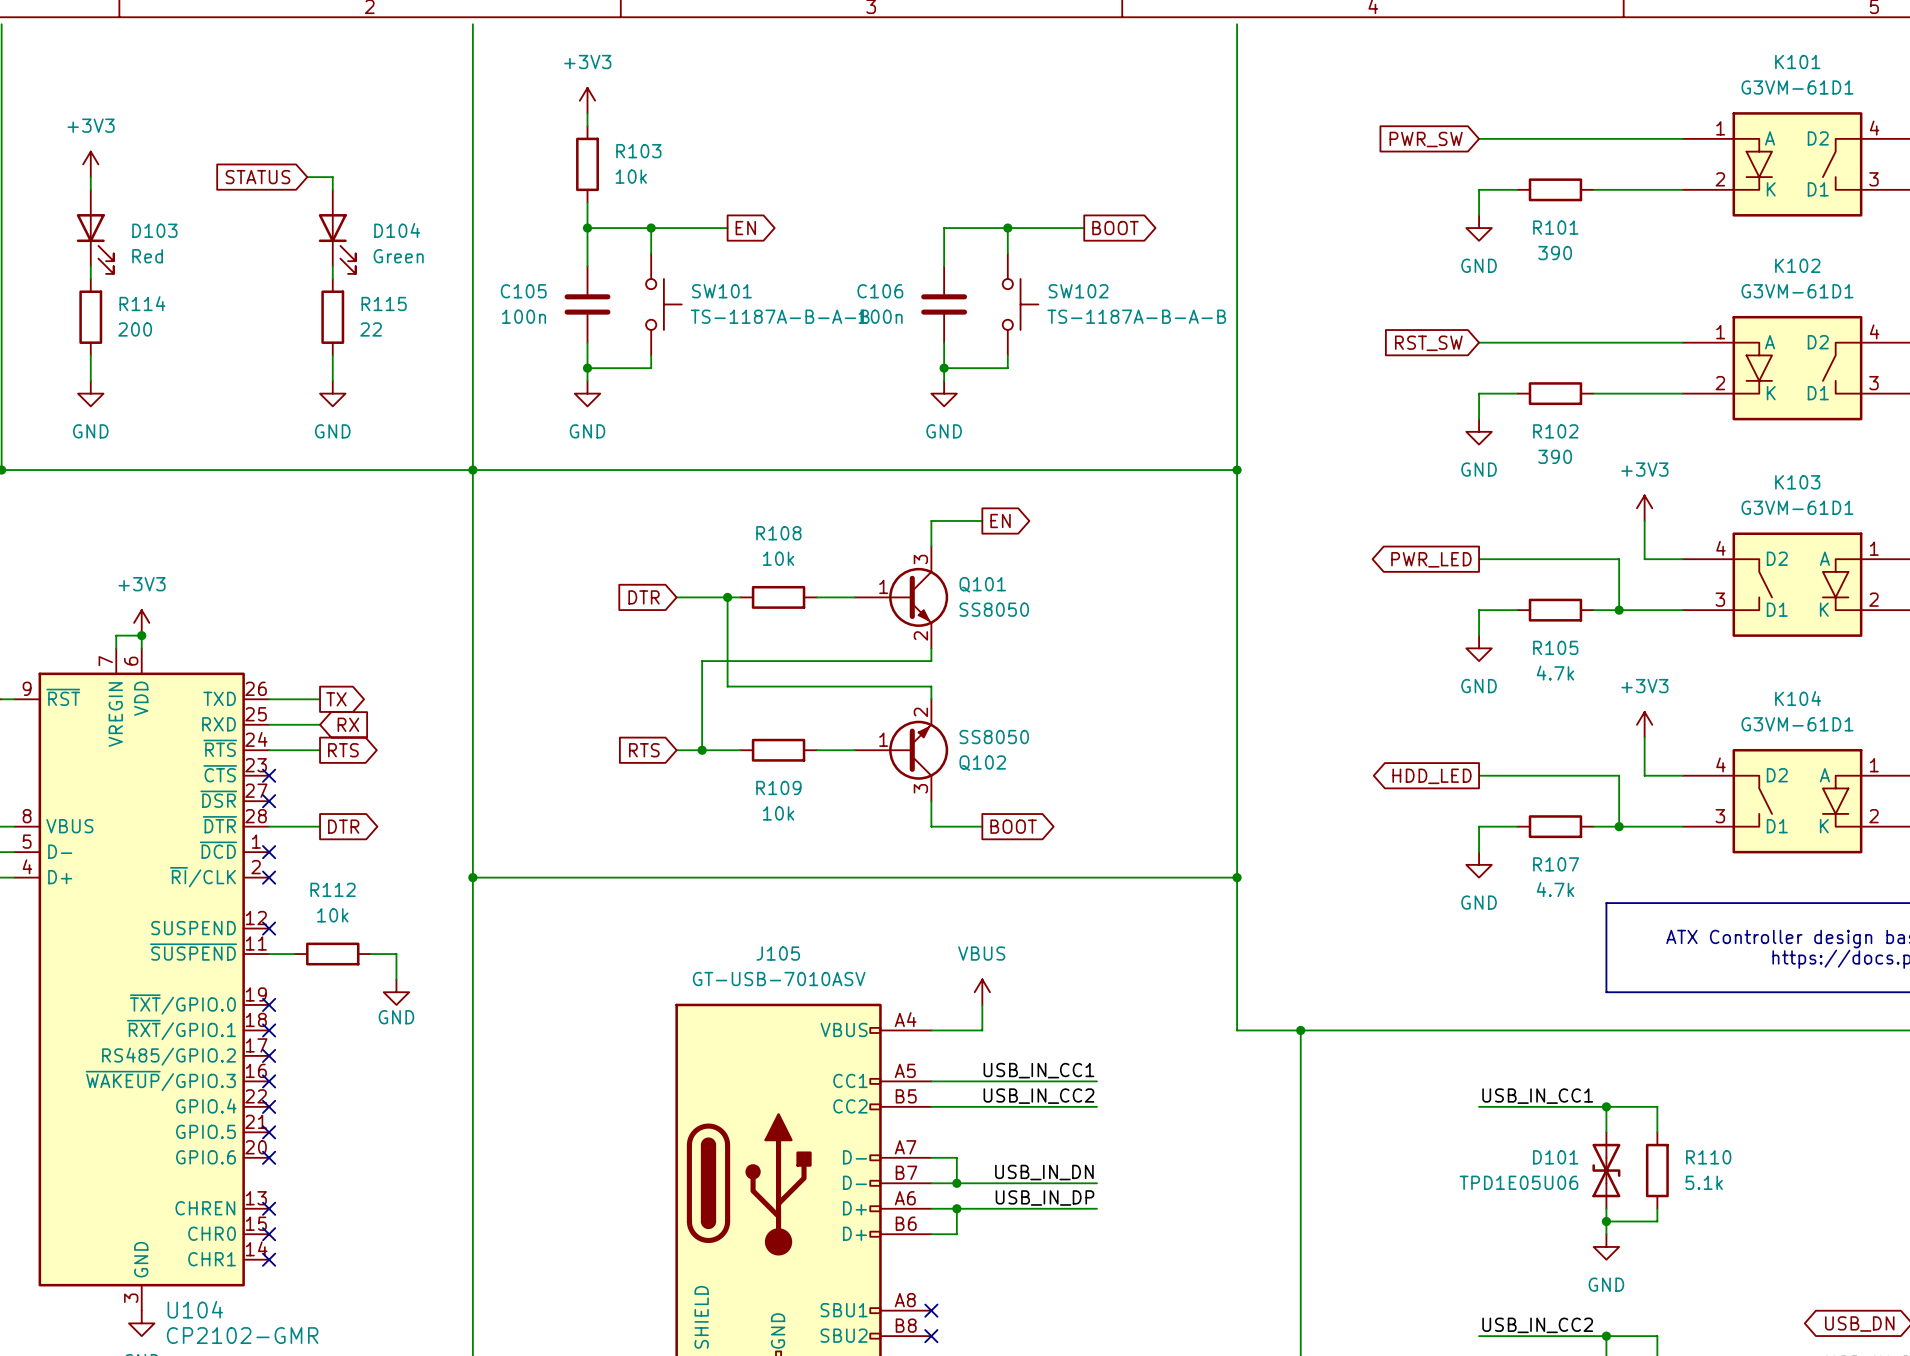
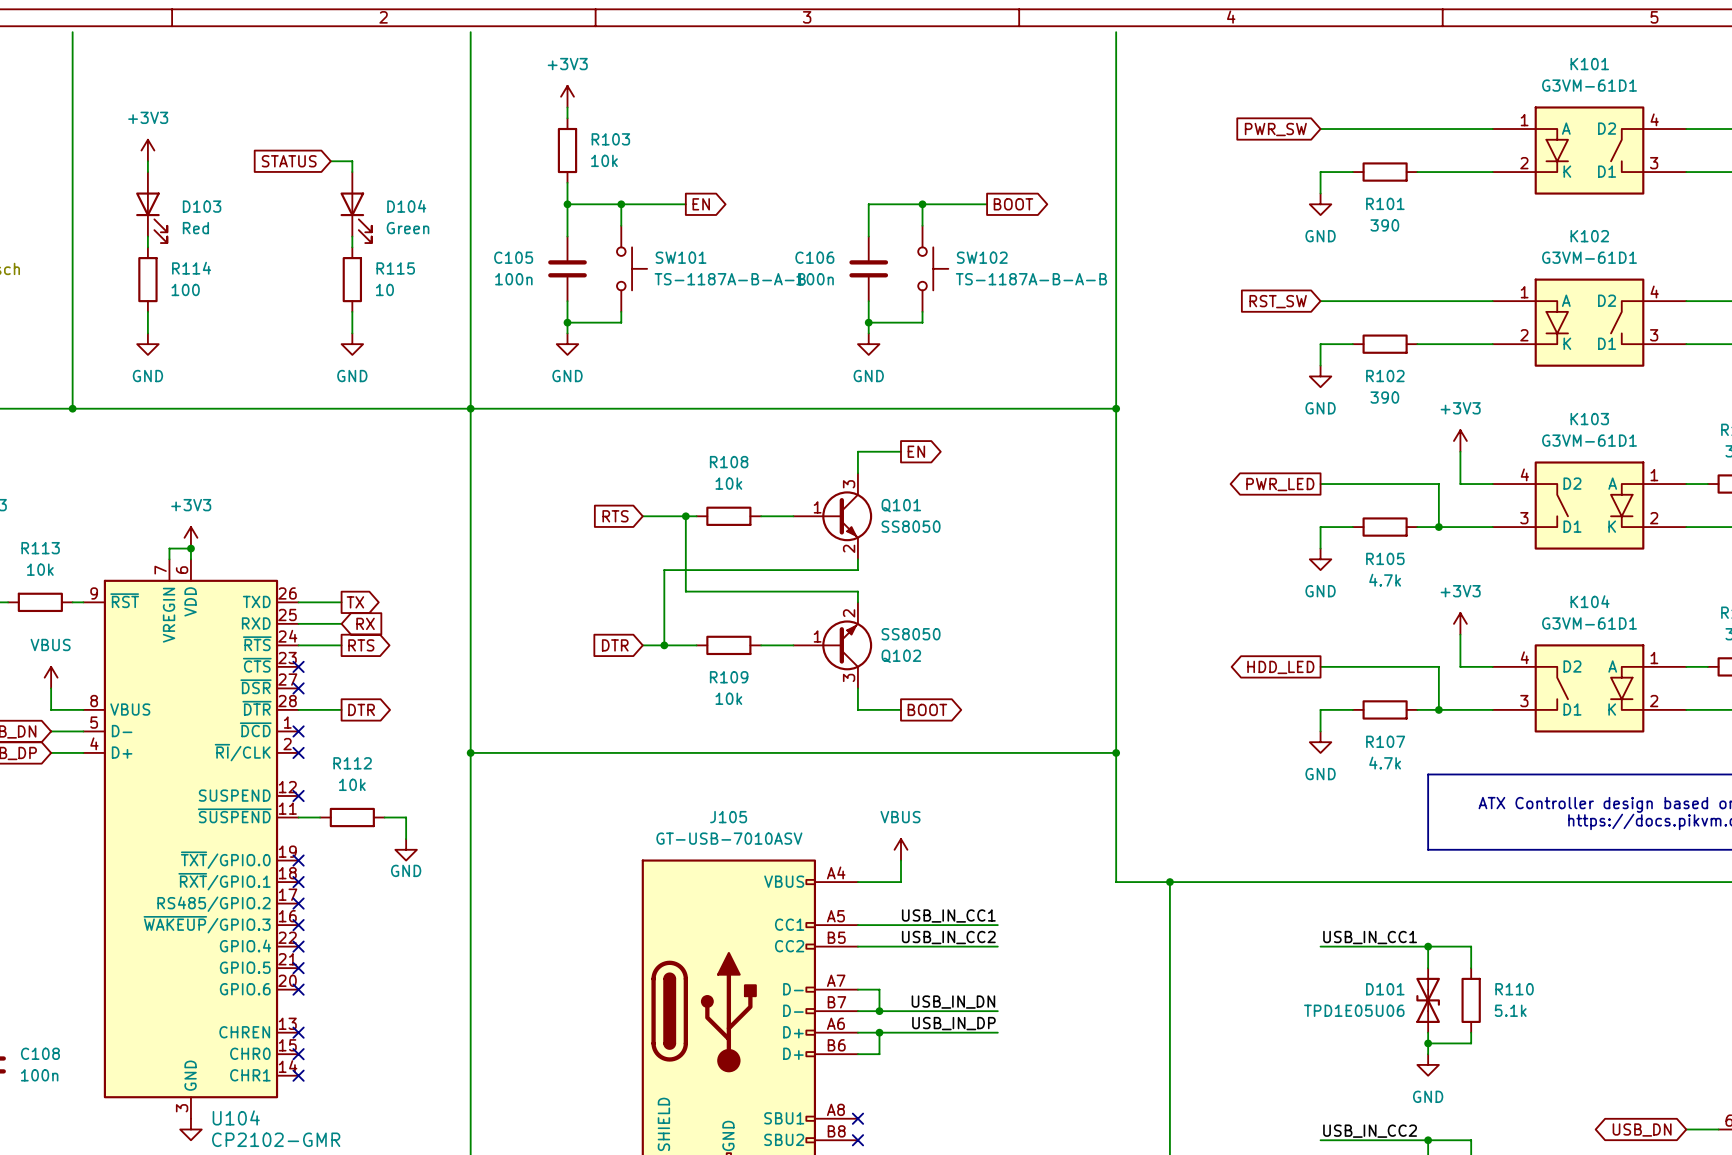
R114 value: 200 (135, 329) -> 100 (185, 289)
R115 value: 22 (371, 329) -> 10 (384, 289)
global label: DTR (644, 597) -> RTS (615, 516)
global label: RTS (644, 750) -> DTR (615, 645)

